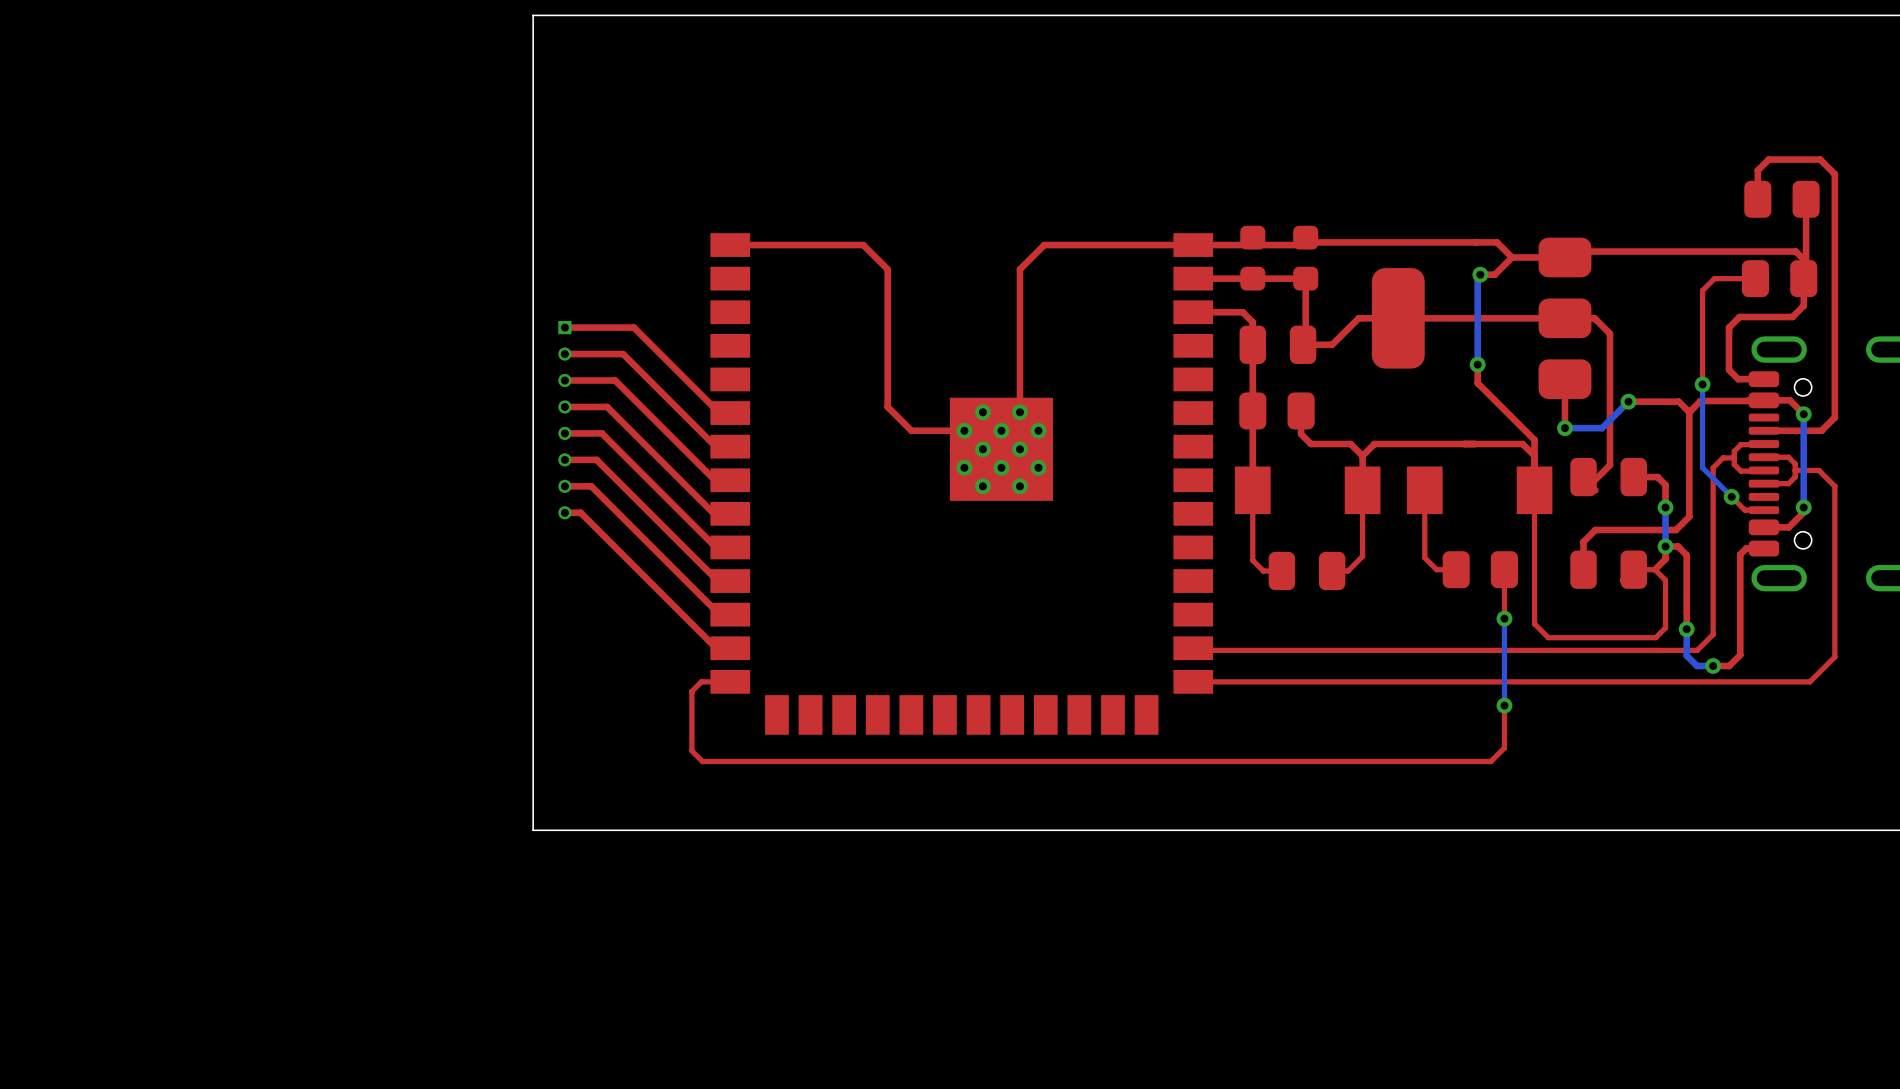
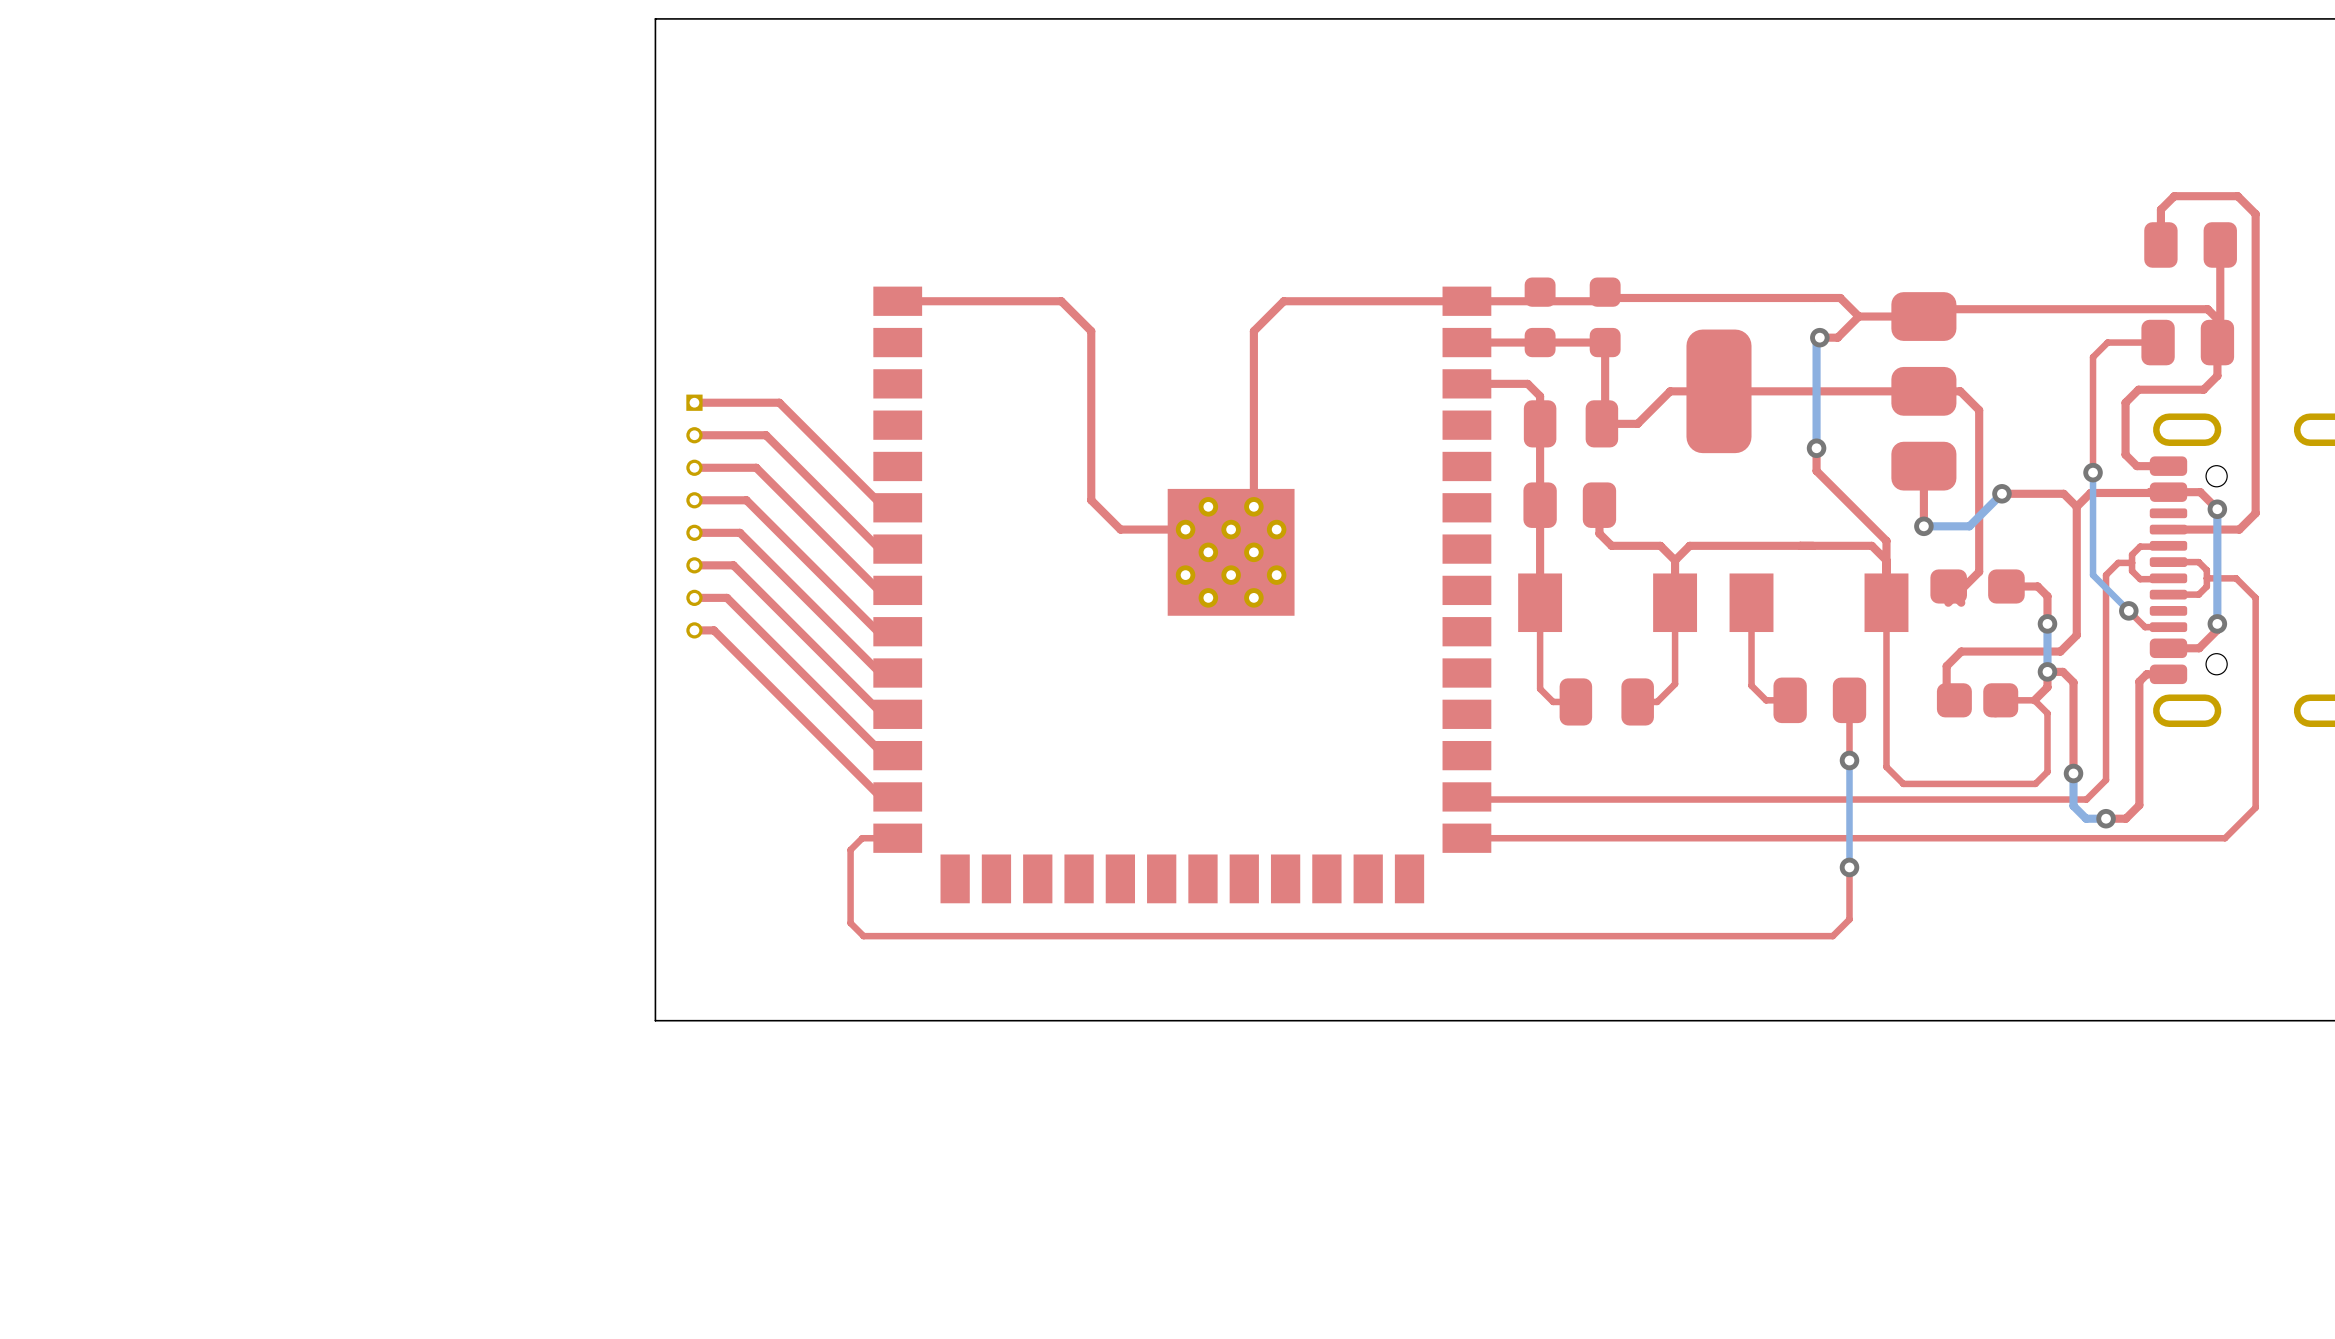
part footprint: [1570, 457, 1648, 497] -> [1930, 569, 2025, 604]
part footprint: [1570, 550, 1648, 589] -> [1936, 683, 2019, 718]

